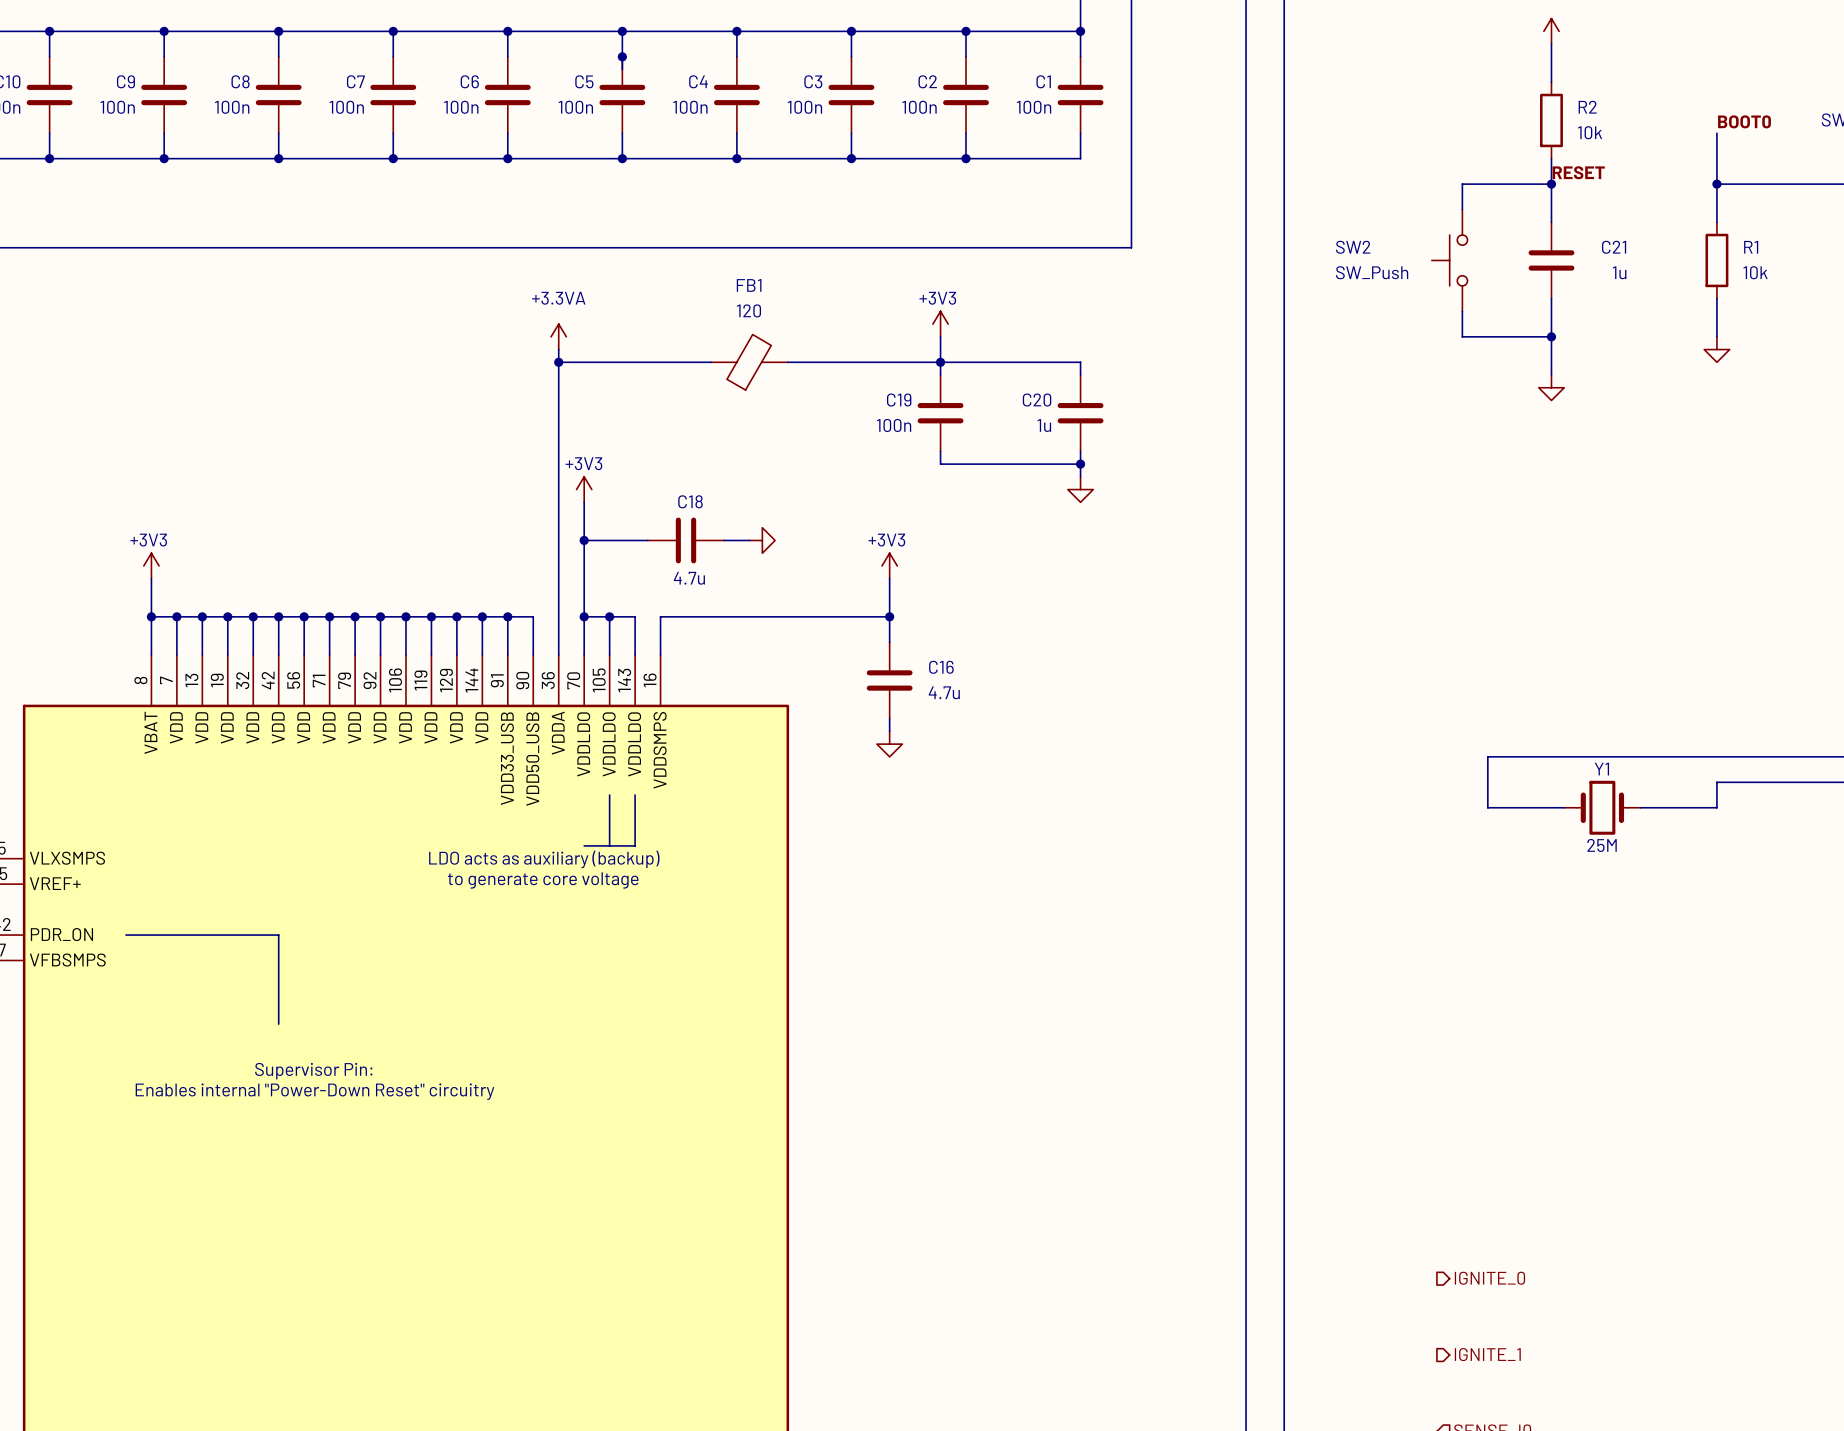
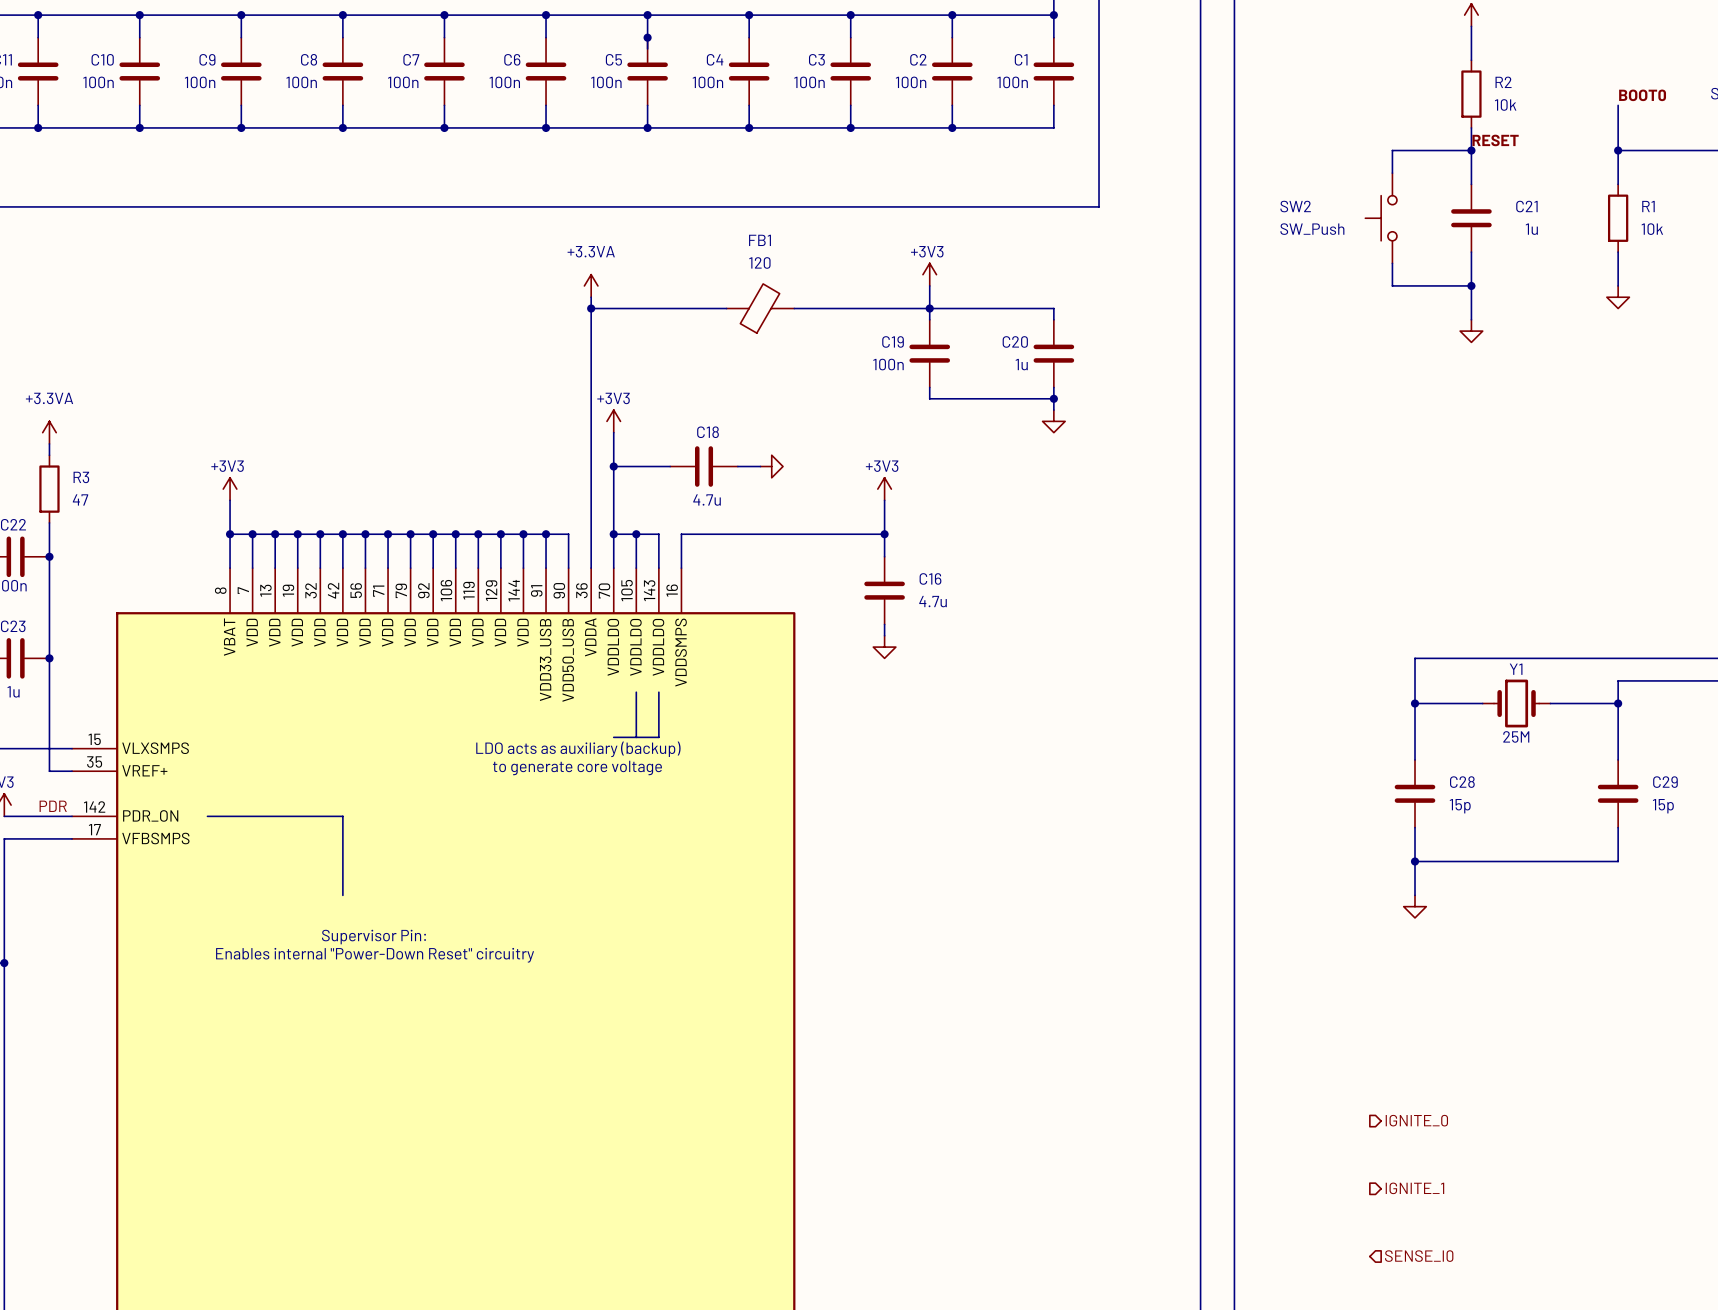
wire: none -> (1415, 703) (1415, 759)
junction: none -> (1415, 703)
wire: none -> (1618, 703) (1618, 759)
junction: none -> (1618, 703)
C28: none -> 15p (1415, 793)
C29: none -> 15p (1618, 793)
wire: none -> (1415, 827) (1415, 895)
wire: none -> (1618, 827) (1618, 861) (1415, 861)
junction: none -> (1415, 861)
power symbol: none -> (1415, 906)

